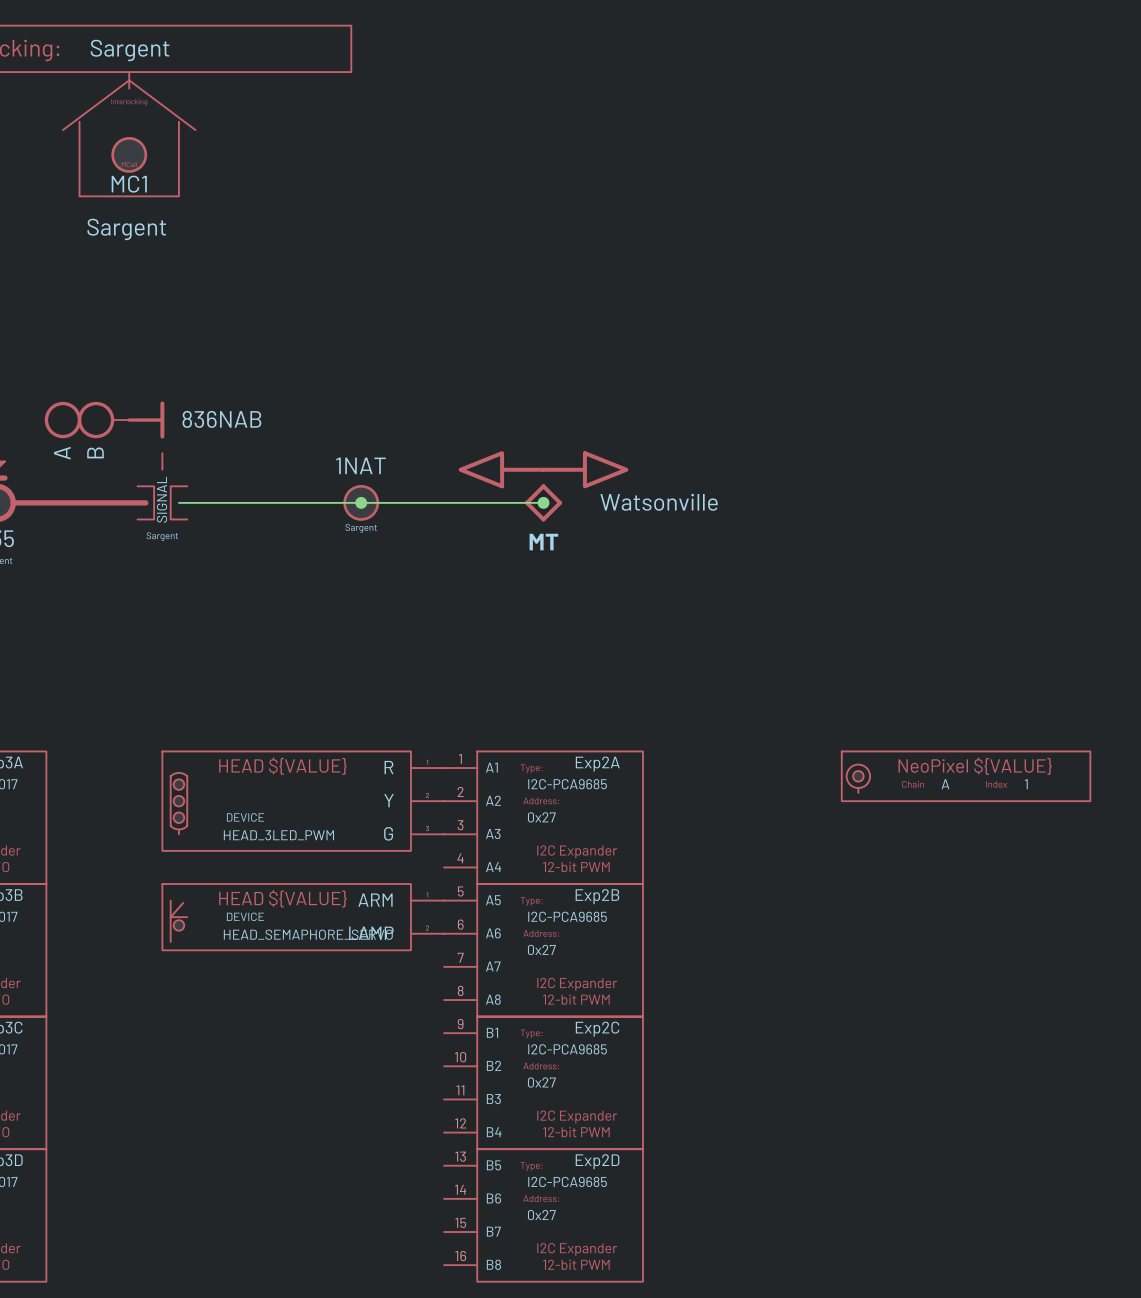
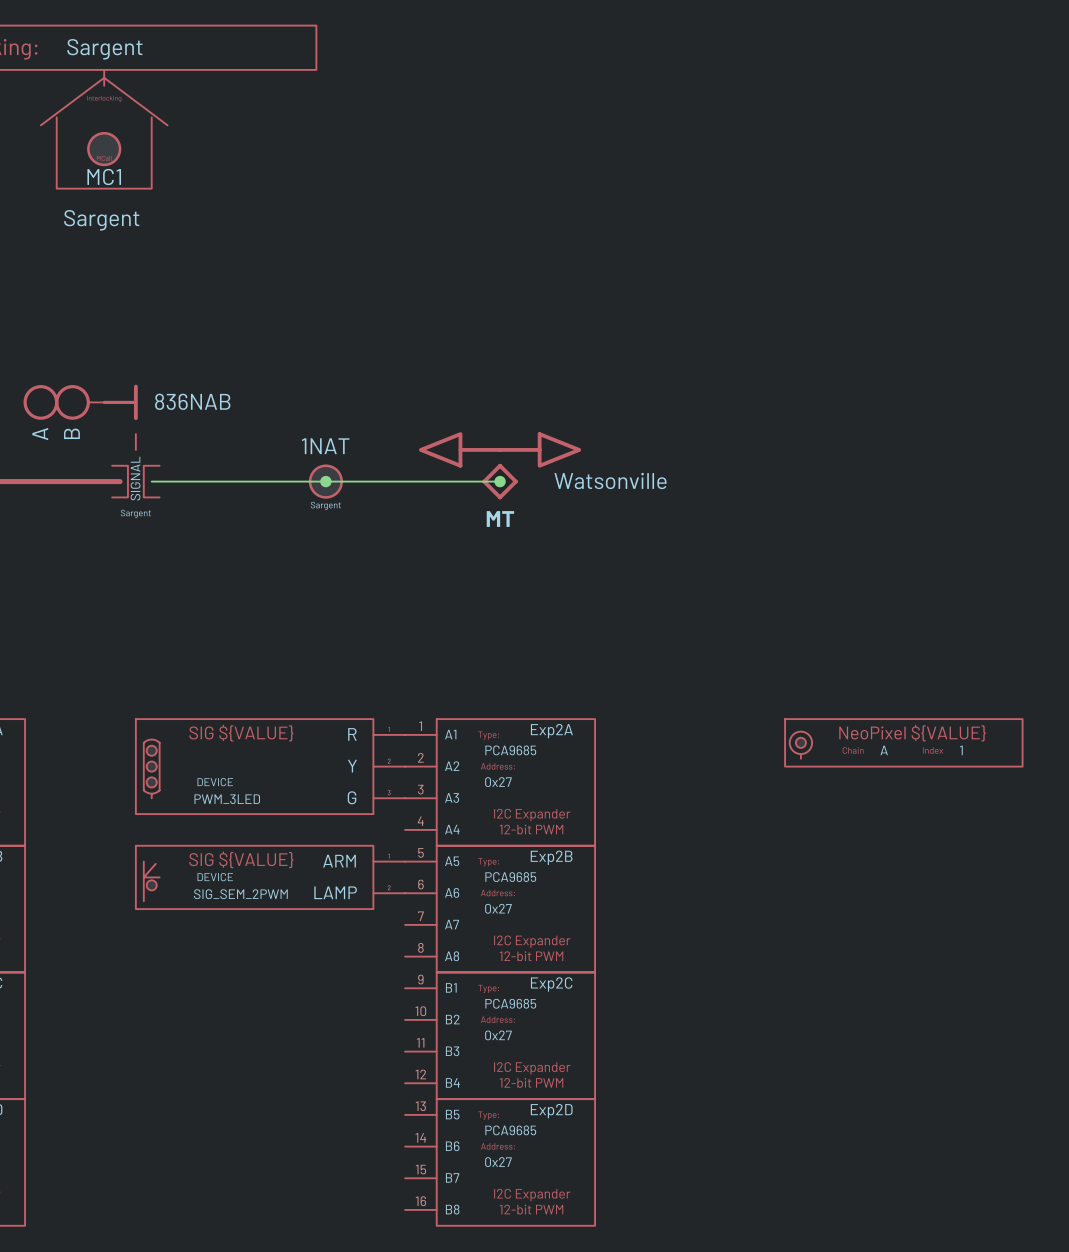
part text: HEAD ${VALUE} (282, 766) -> SIG ${VALUE} (241, 733)
Exp2A text: I2C-PCA9685 (567, 784) -> PCA9685 (510, 750)
part text: HEAD_3LED_PWM (278, 835) -> PWM_3LED (227, 799)
part text: HEAD ${VALUE} (282, 898) -> SIG ${VALUE} (241, 859)
Exp2B text: I2C-PCA9685 (567, 916) -> PCA9685 (510, 877)
part text: HEAD_SEMAPHORE_SERVO (308, 934) -> SIG_SEM_2PWM (240, 894)
Exp2C text: I2C-PCA9685 (567, 1049) -> PCA9685 (510, 1003)
Exp2D text: I2C-PCA9685 (567, 1181) -> PCA9685 (510, 1130)

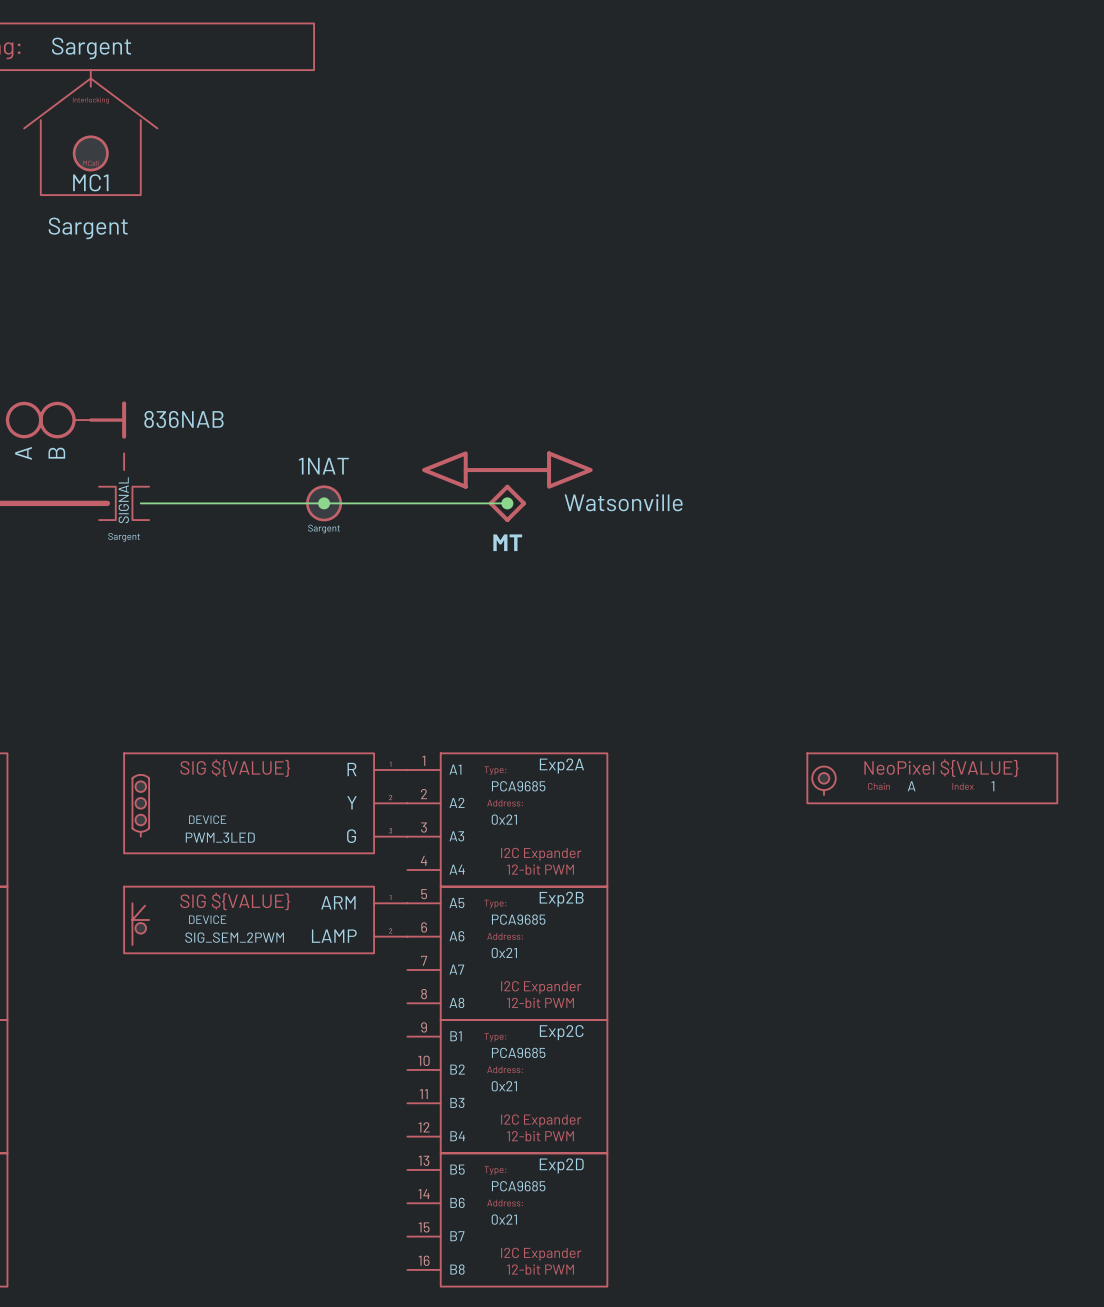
Exp2A value: 0x27 (498, 782) -> 0x21 (504, 819)
Exp2B value: 0x27 (498, 908) -> 0x21 (504, 952)
Exp2C value: 0x27 (498, 1035) -> 0x21 (504, 1086)
Exp2D value: 0x27 (498, 1162) -> 0x21 (504, 1219)

